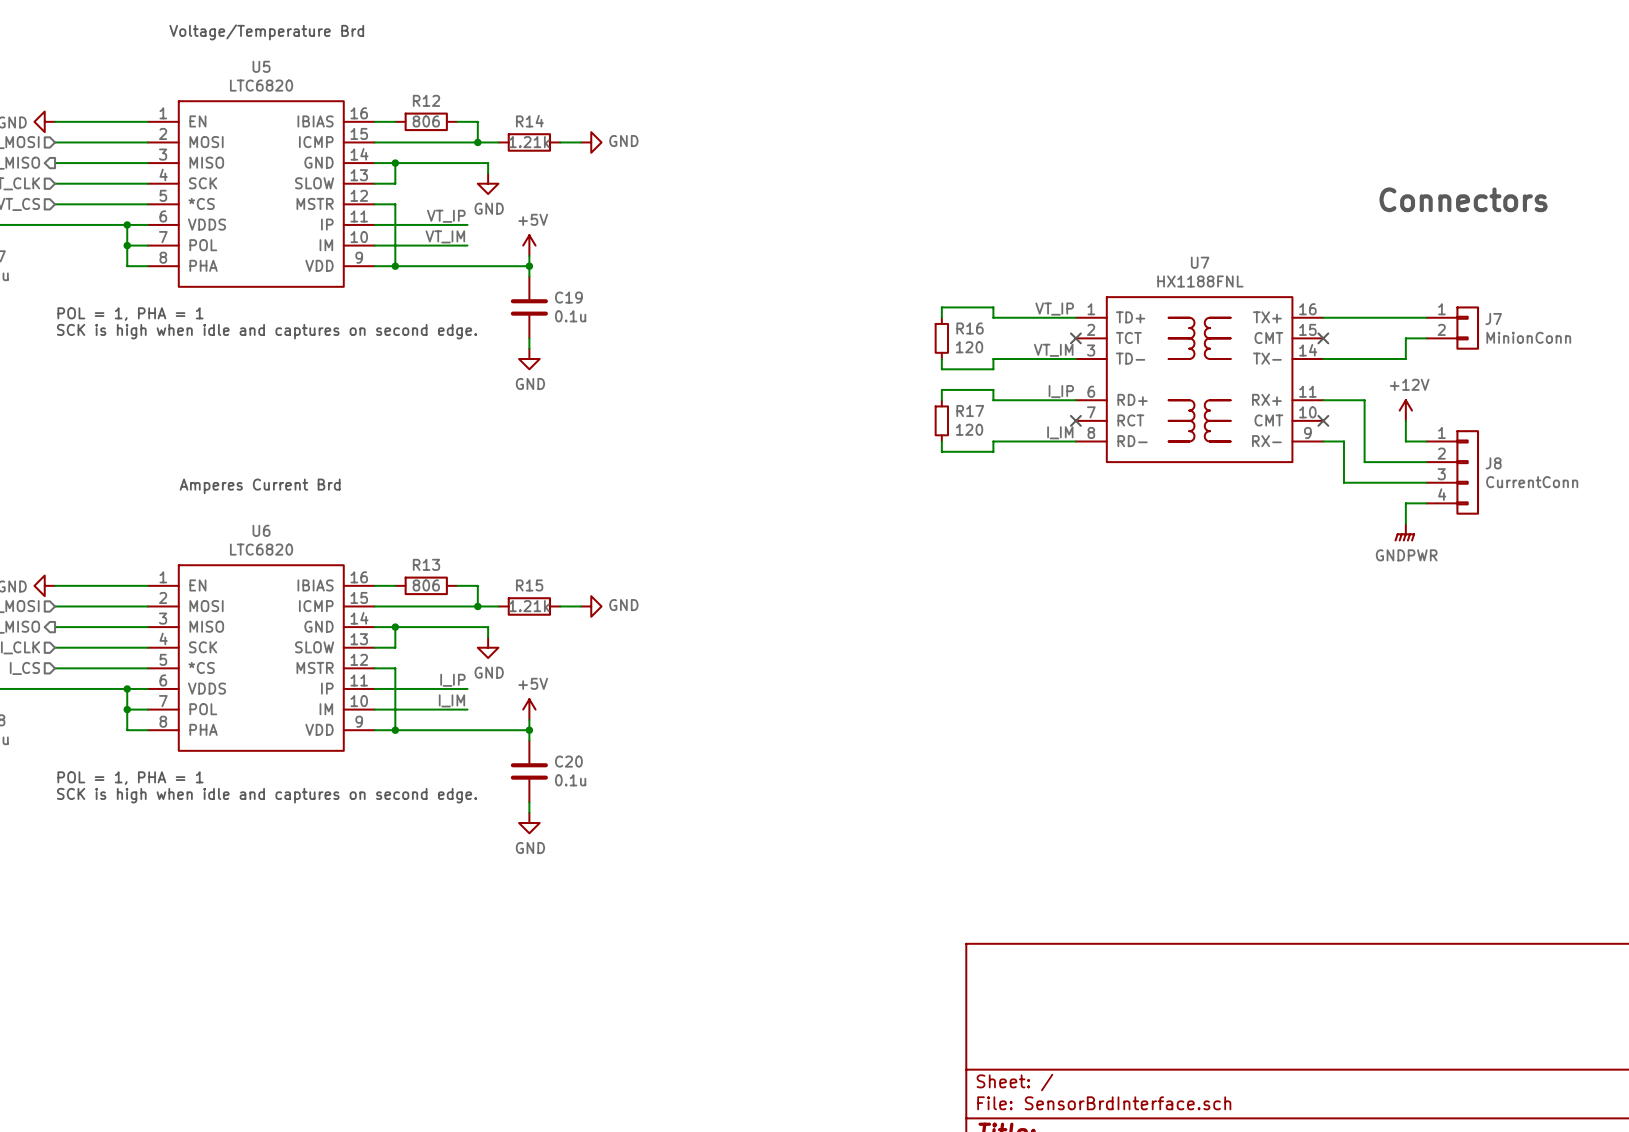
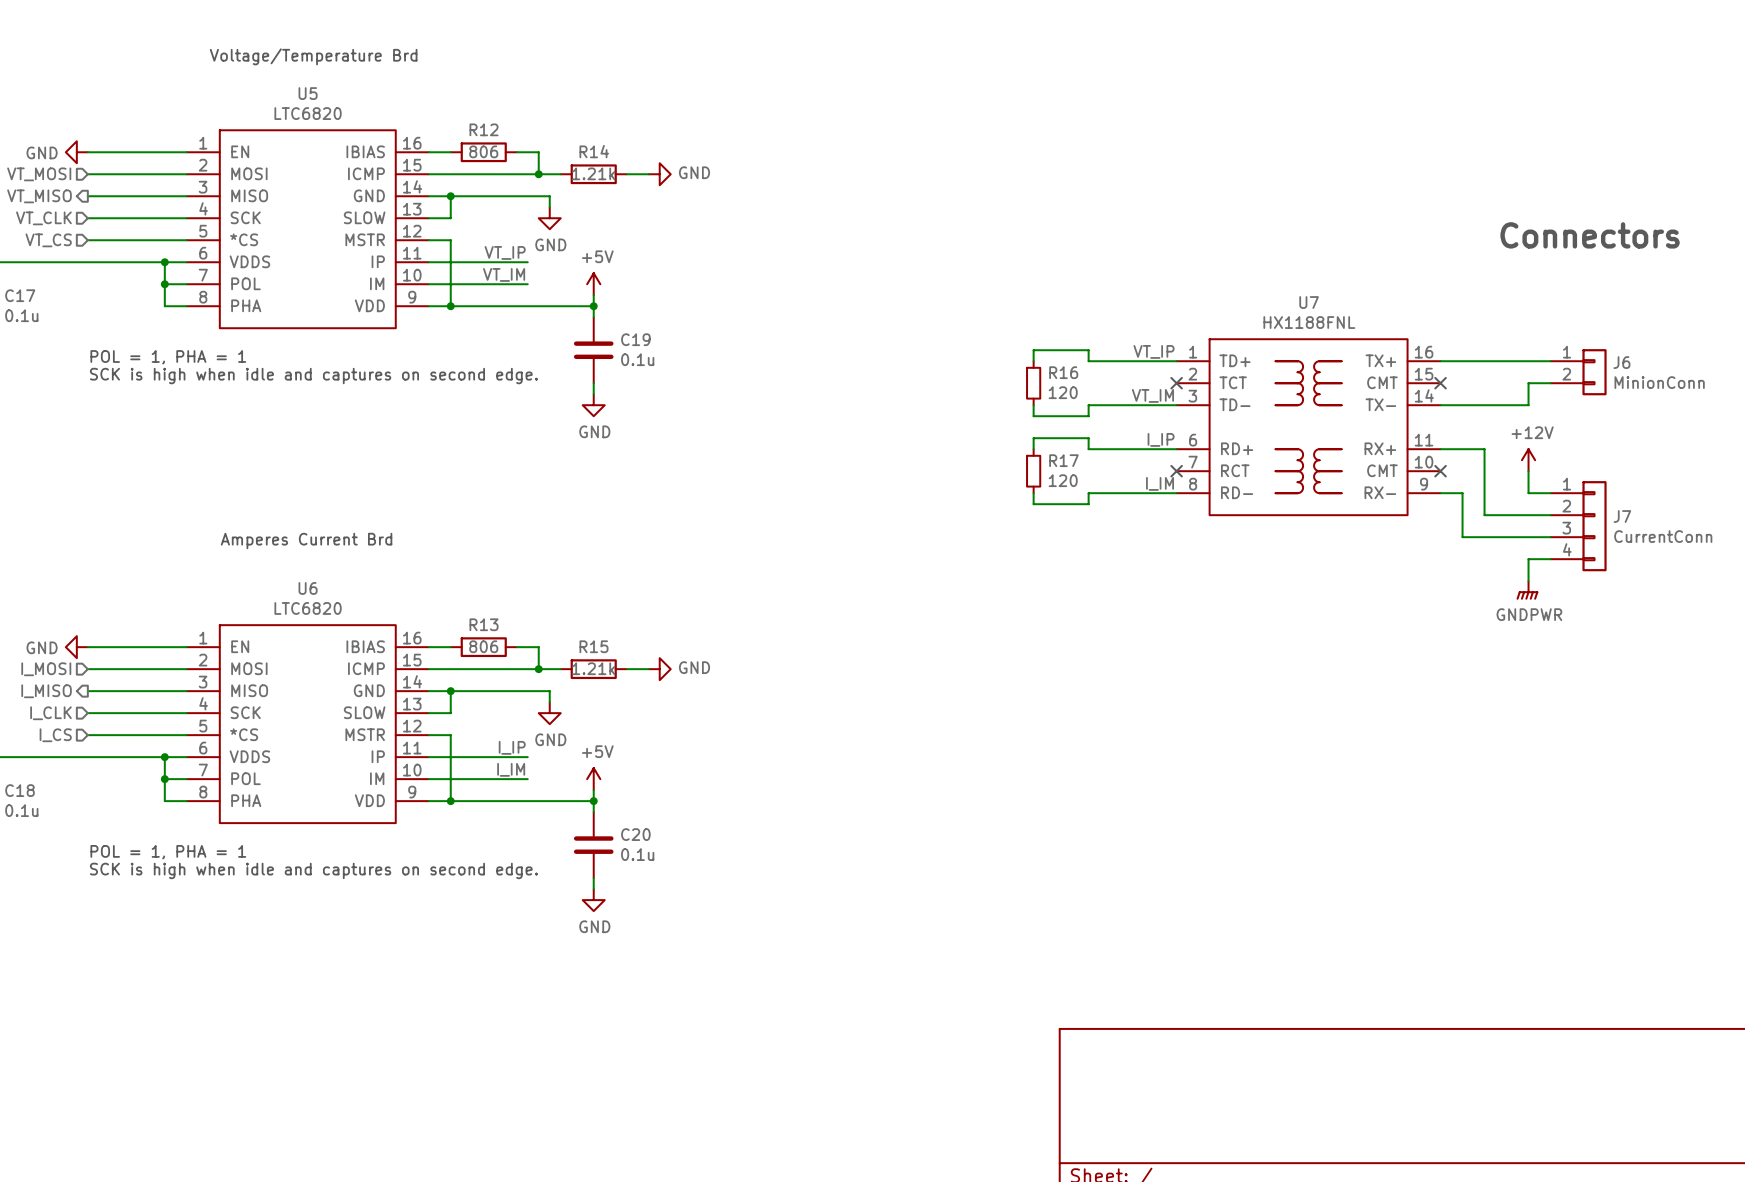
J7 name: J7 (1493, 319) -> J6 (1621, 362)
J8 name: J8 (1493, 463) -> J7 (1622, 516)

